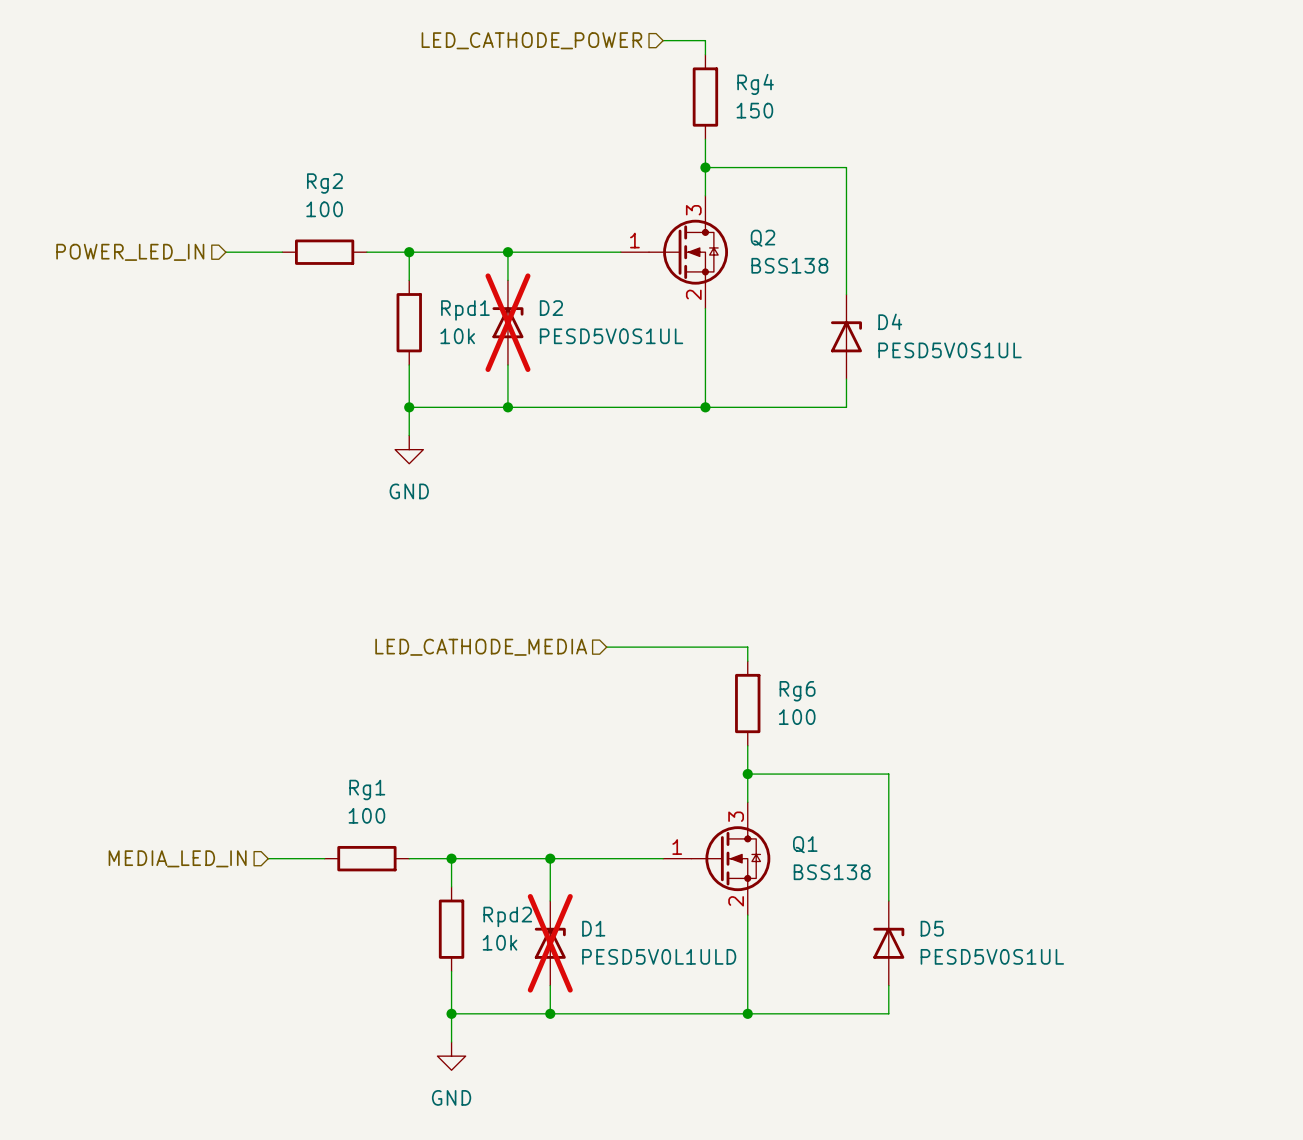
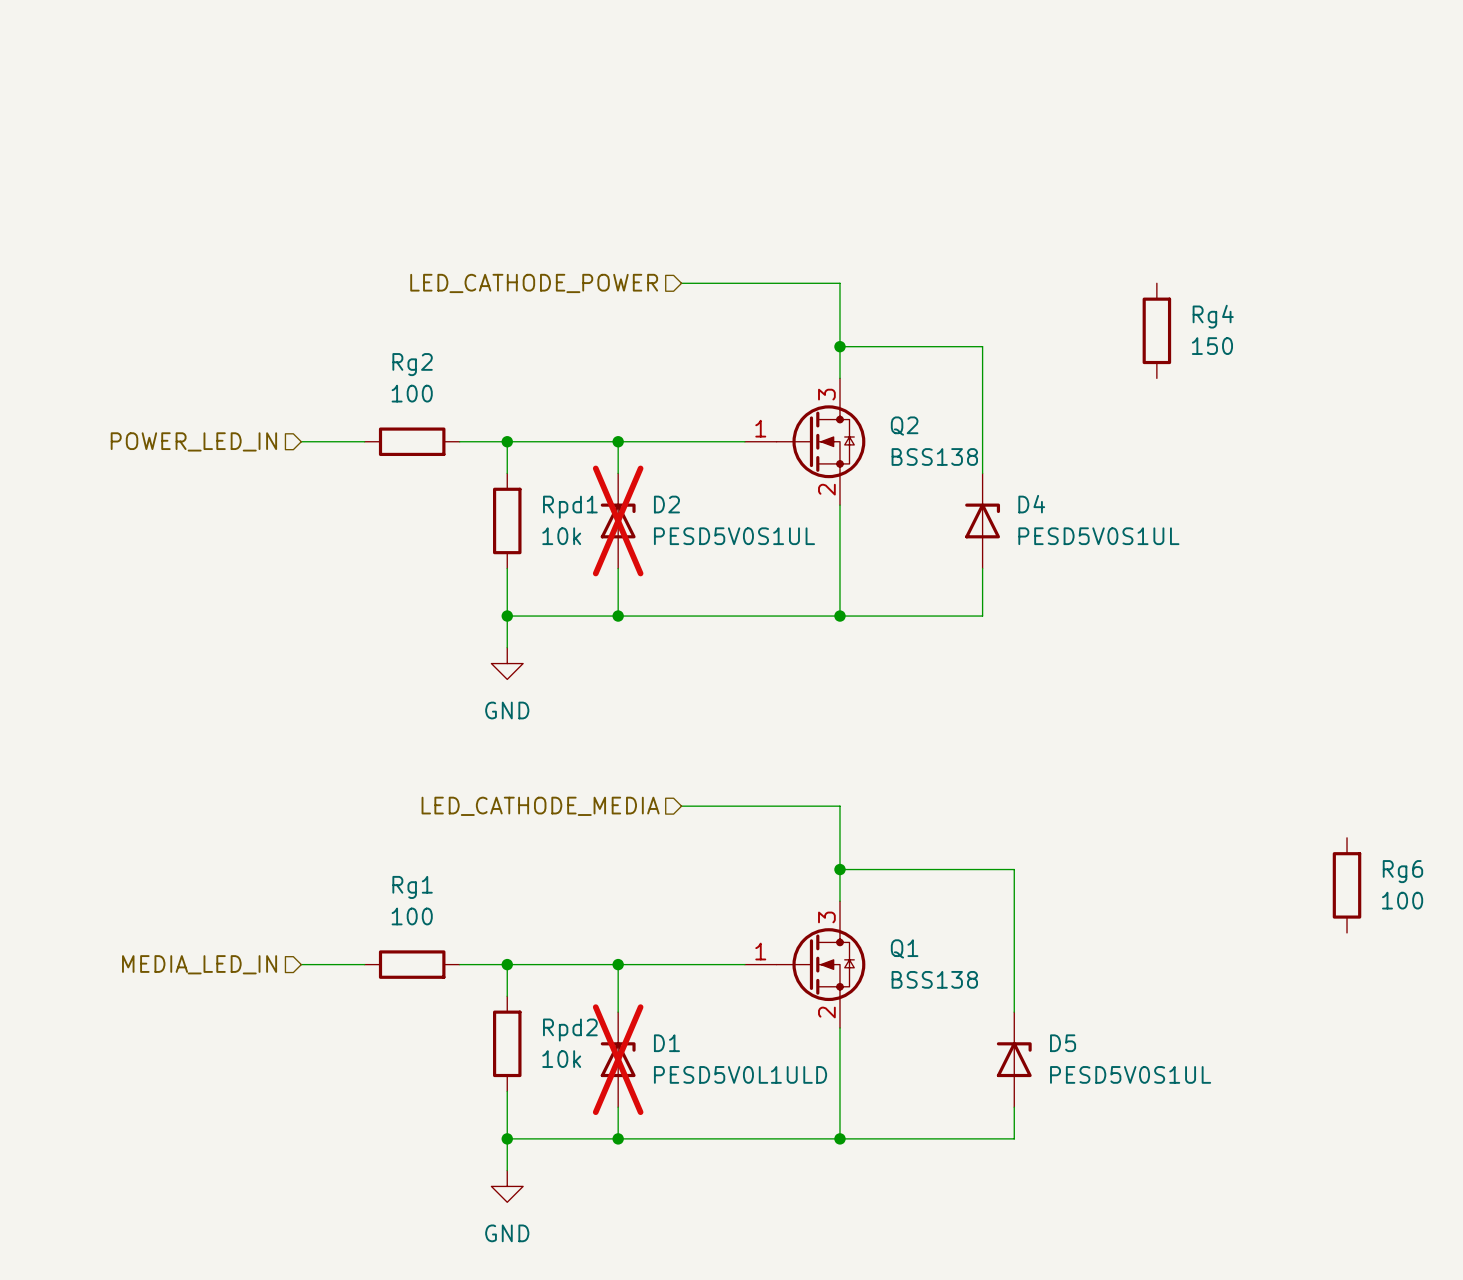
hierarchical label position: LED_CATHODE_POWER (531, 40) -> LED_CATHODE_POWER (534, 283)
wire: (663, 40) (705, 40) (705, 54) -> none
Rg4 position: (705, 97) -> (1156, 330)
wire: (705, 139) (705, 195) -> none
wire: (705, 167) (846, 167) (846, 294) -> none
junction: (705, 167) -> none
hierarchical label position: POWER_LED_IN (130, 252) -> POWER_LED_IN (193, 441)
wire: (225, 252) (282, 252) -> (301, 441) (364, 441)
Rg2 position: (324, 252) -> (412, 441)
wire: (366, 252) (606, 252) -> none
wire: (409, 252) (409, 280) -> (507, 441) (507, 473)
junction: (409, 252) -> none
wire: (507, 252) (507, 280) -> (618, 441) (618, 473)
junction: (507, 252) -> none
wire: none -> (697, 283) (839, 283) (839, 378)
Q2 position: (674, 252) -> (805, 441)
wire: (705, 308) (705, 407) -> (839, 505) (839, 616)
wire: none -> (839, 346) (982, 346) (982, 473)
junction: none -> (839, 346)
Rpd1 position: (409, 322) -> (507, 520)
D2 position: (507, 322) -> (618, 520)
D4 position: (846, 336) -> (982, 520)
wire: (409, 365) (409, 435) -> (507, 568) (507, 647)
wire: (507, 365) (507, 407) -> (618, 568) (618, 616)
wire: (846, 379) (846, 407) (409, 407) -> none
wire: none -> (459, 441) (744, 441)
junction: none -> (507, 441)
junction: none -> (618, 441)
junction: (409, 407) -> none
junction: (507, 407) -> none
junction: (705, 407) -> none
power symbol position: GND (409, 449) -> GND (507, 663)
wire: none -> (982, 568) (982, 616) (507, 616)
junction: none -> (507, 616)
junction: none -> (618, 616)
junction: none -> (839, 616)
hierarchical label position: LED_CATHODE_MEDIA (481, 647) -> LED_CATHODE_MEDIA (540, 806)
wire: (606, 647) (747, 647) (747, 661) -> none
Rg6 position: (747, 703) -> (1347, 885)
wire: none -> (681, 806) (839, 806) (839, 837)
wire: (888, 774) (888, 900) -> (998, 869) (1014, 869) (1014, 1012)
D5 position: (888, 943) -> (1014, 1059)
wire: (888, 985) (888, 1013) -> (1014, 1107) (1014, 1138) (998, 1138)

